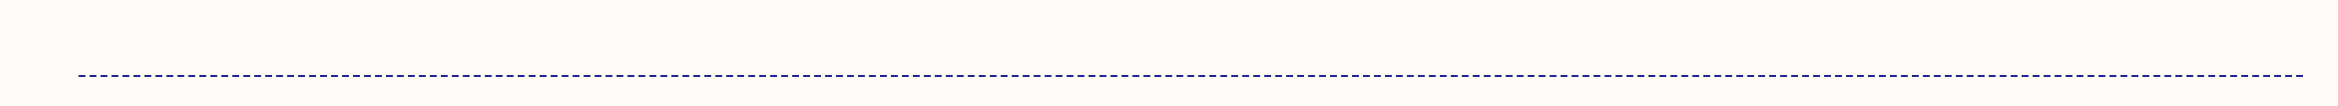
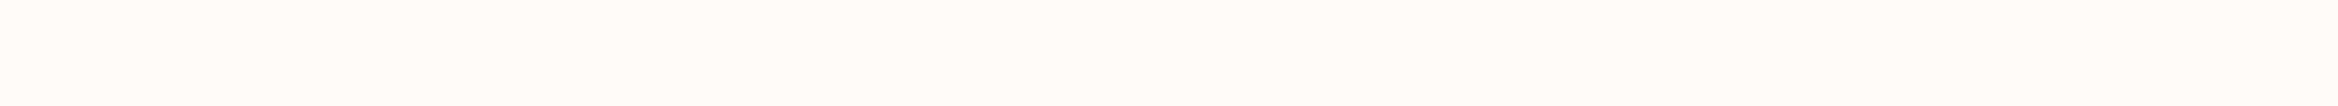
line: (75, 75) (2302, 75) -> none

